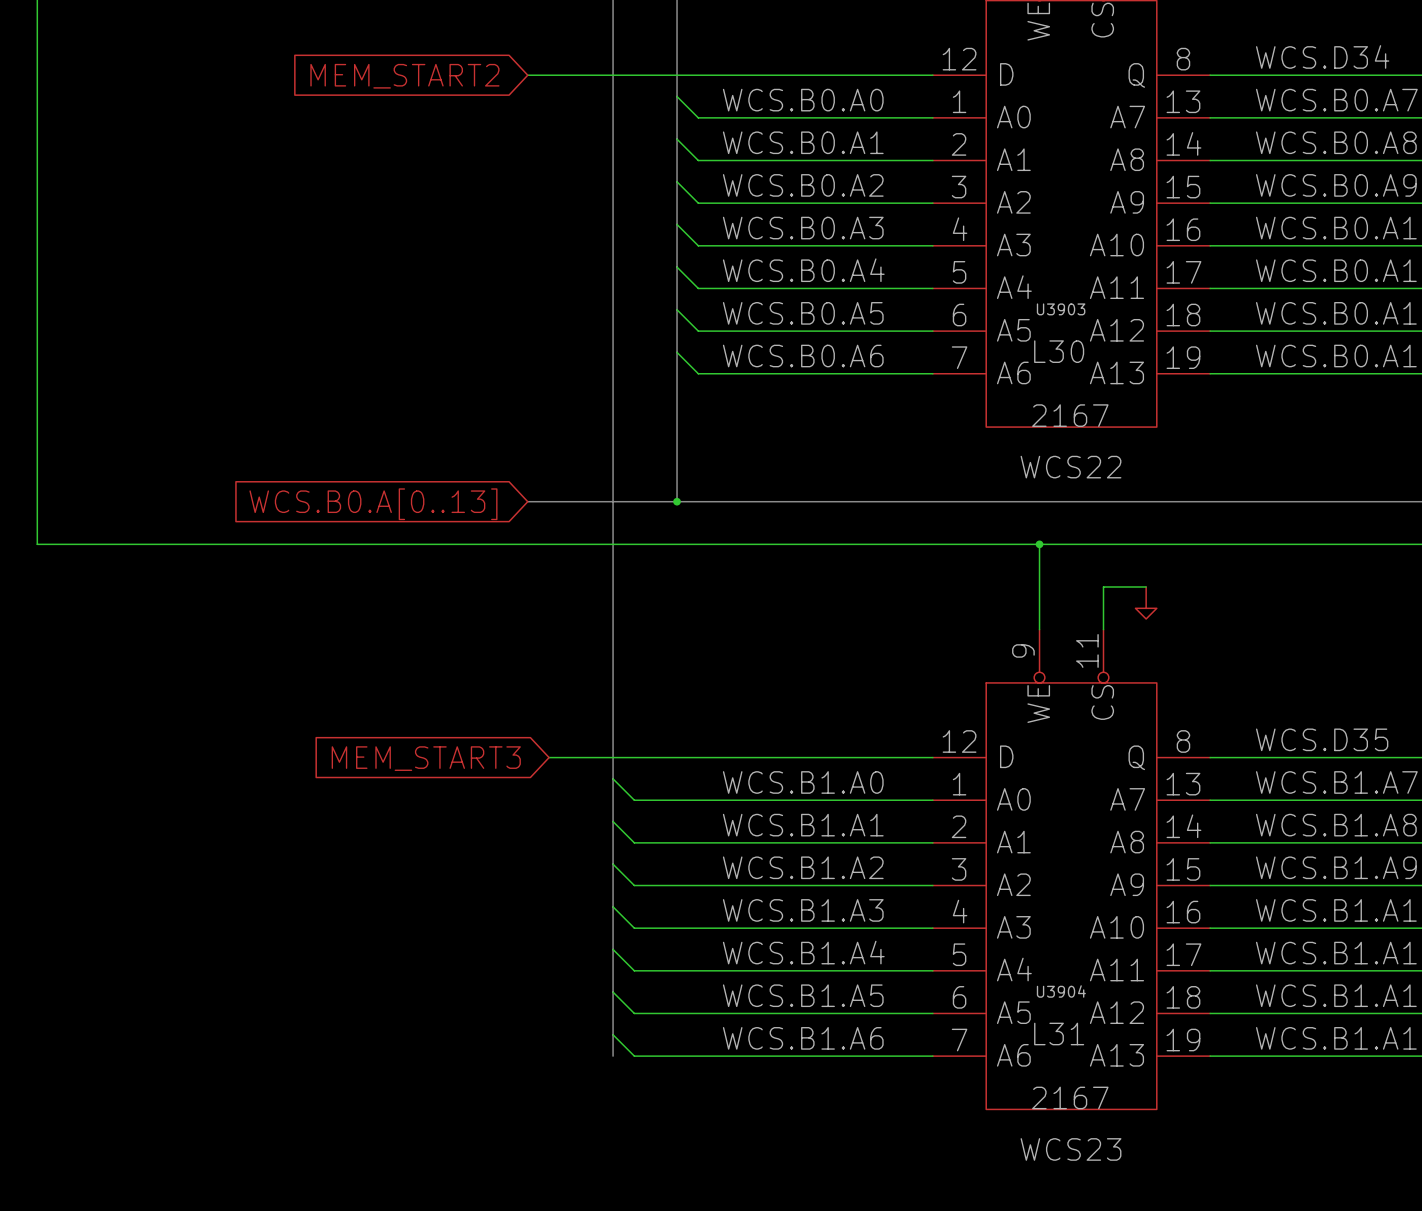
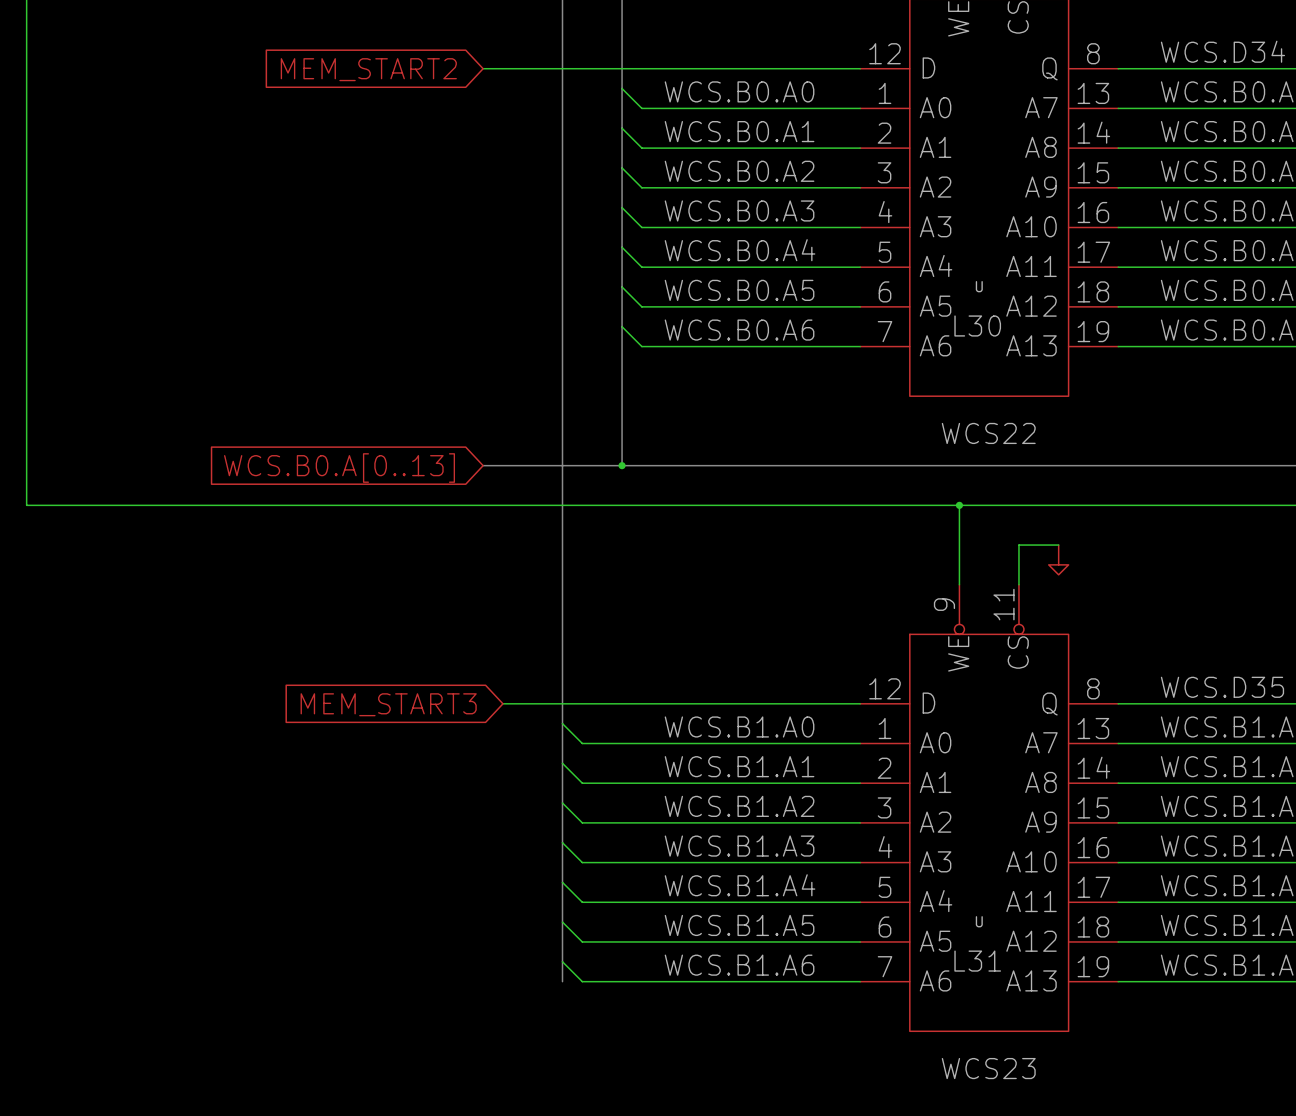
U3903 name: U3903 (1061, 309) -> U (979, 286)
U3903 value: 2167 (1070, 415) -> none
U3904 name: U3904 (1061, 991) -> U (979, 921)
U3904 value: 2167 (1070, 1097) -> none

